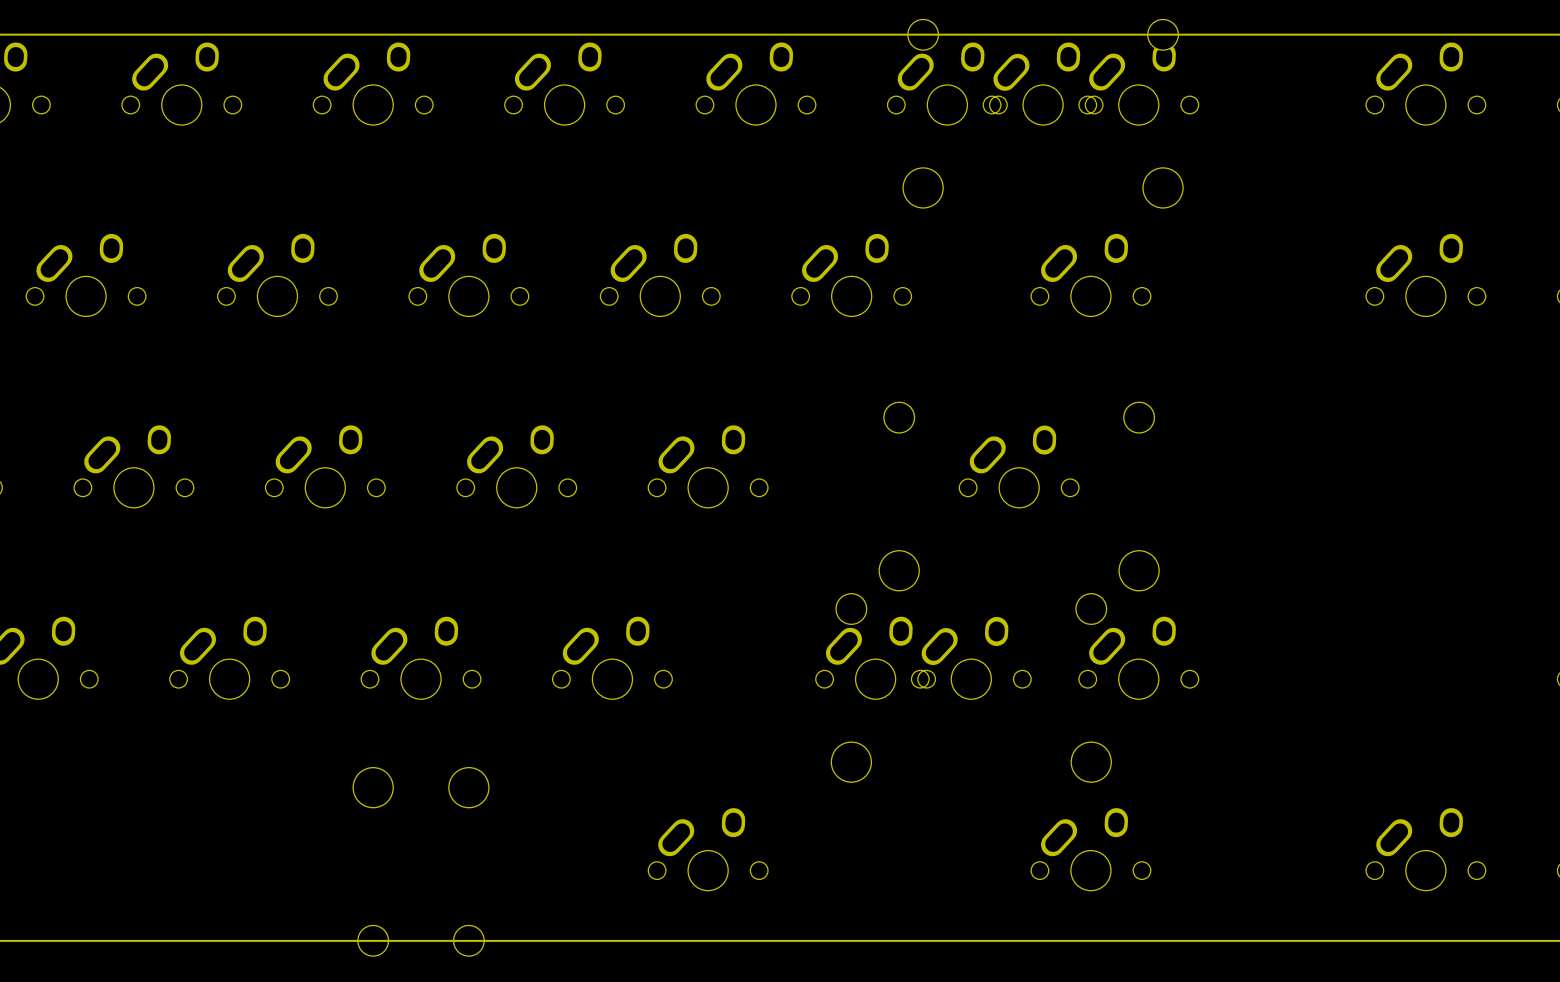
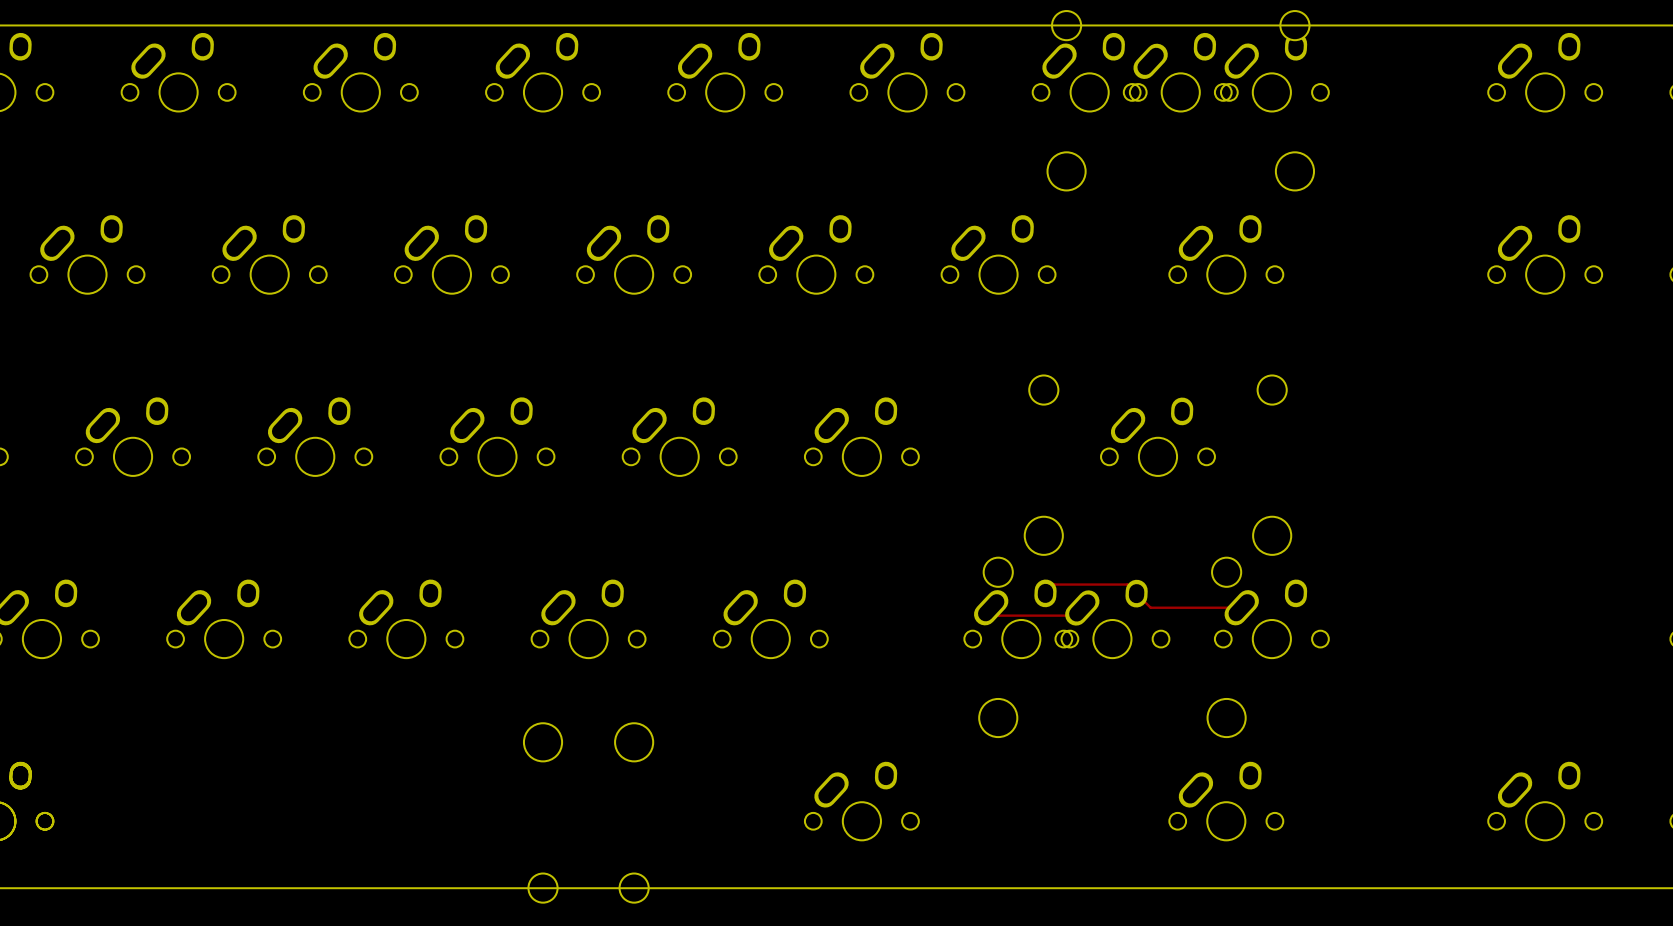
track: none -> (1045, 593) (1054, 584) (1127, 584) (1150, 607) (1241, 607)
track: none -> (991, 607) (999, 615) (1074, 615) (1082, 607)

